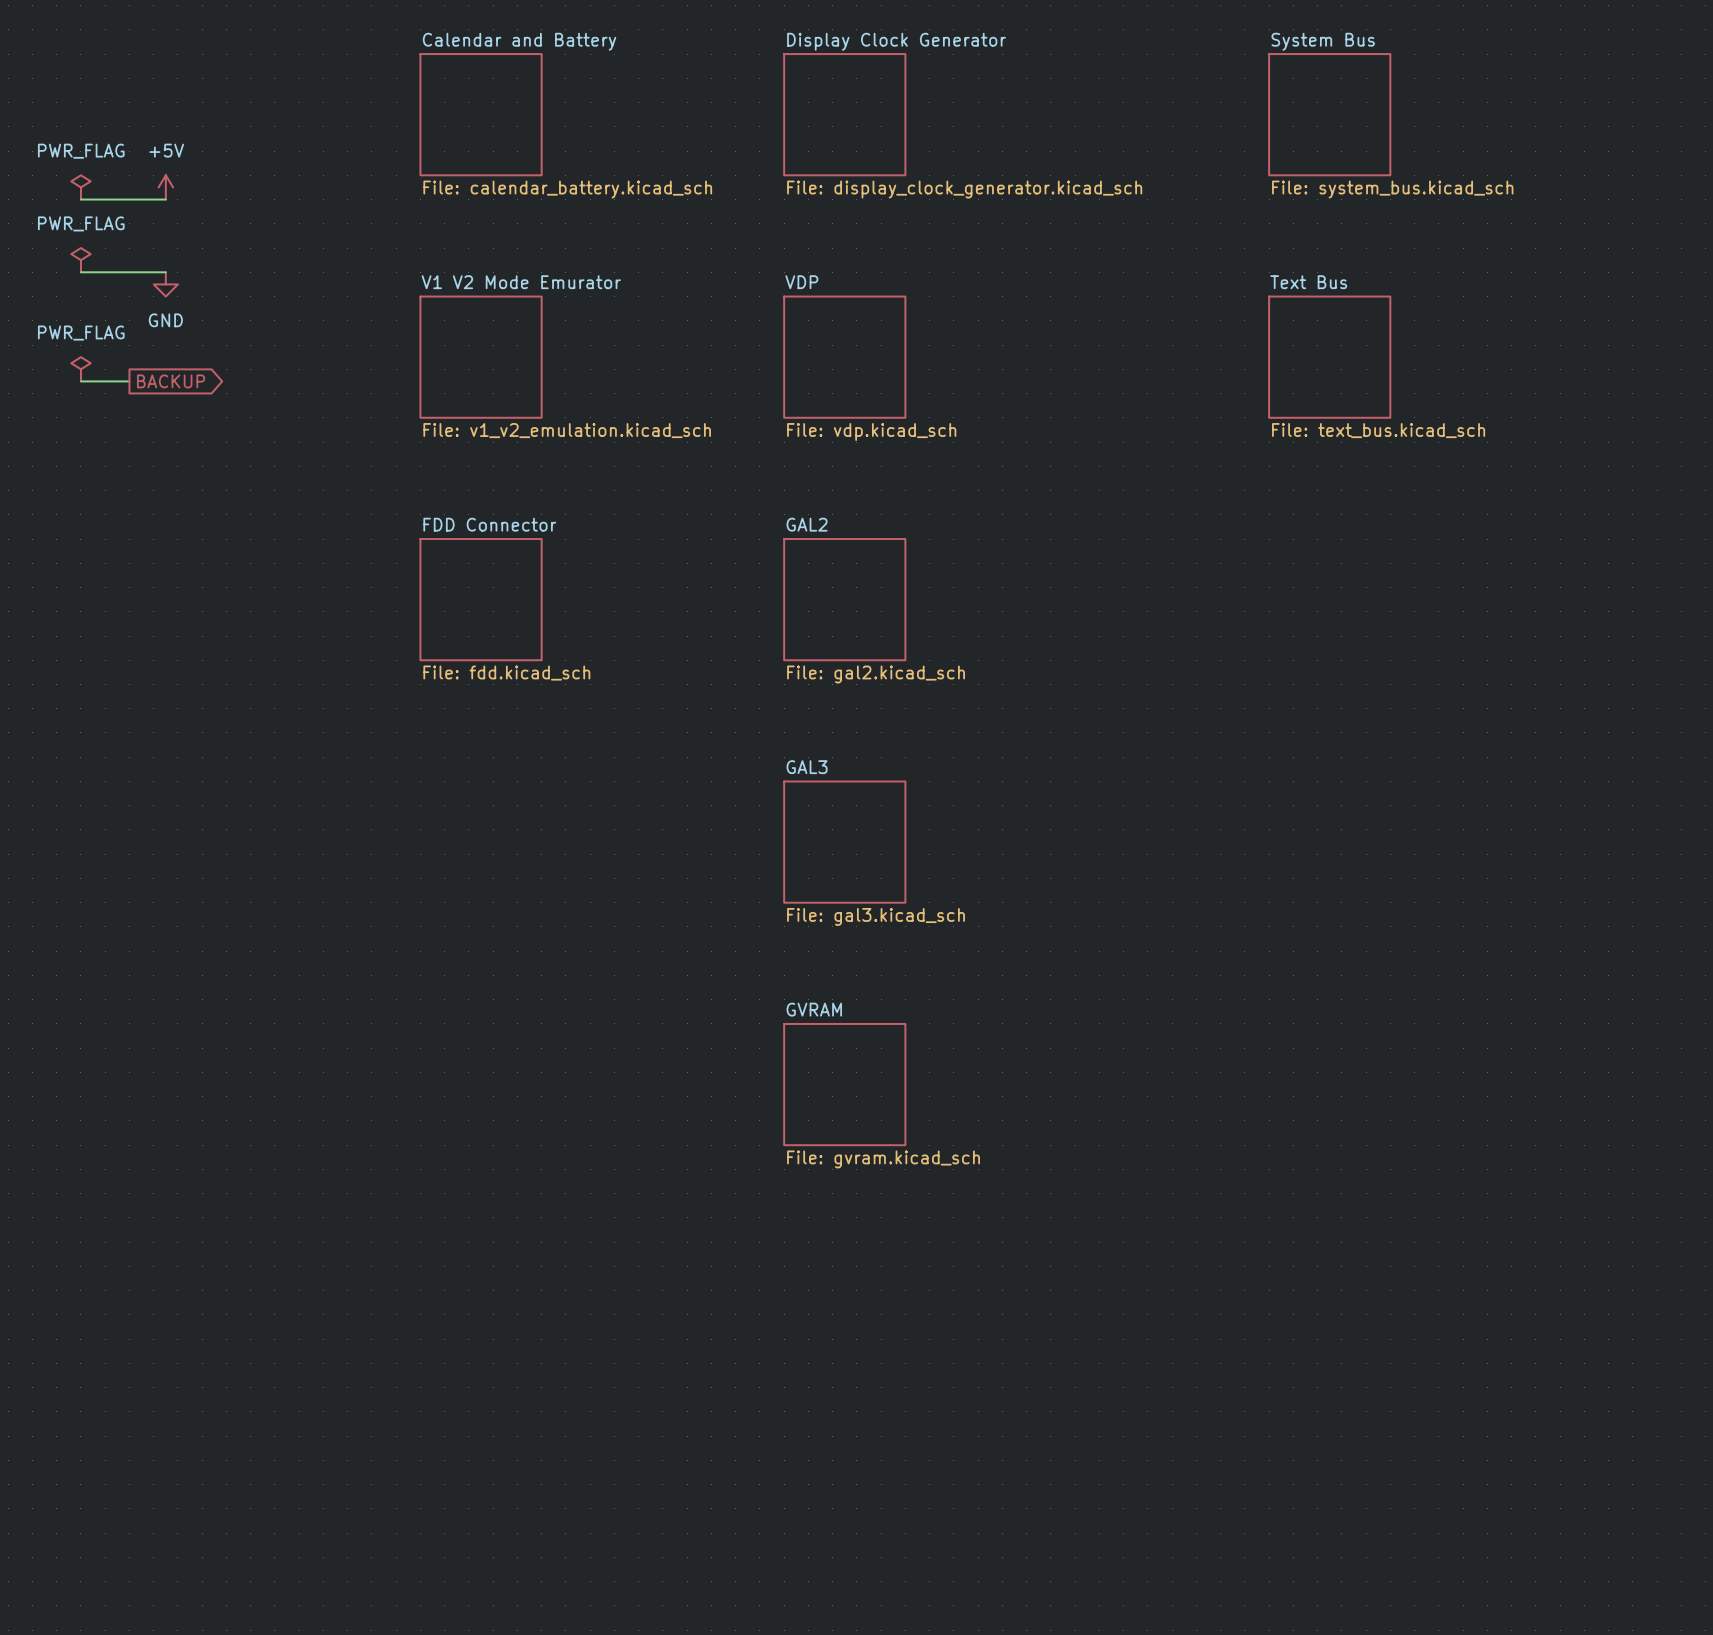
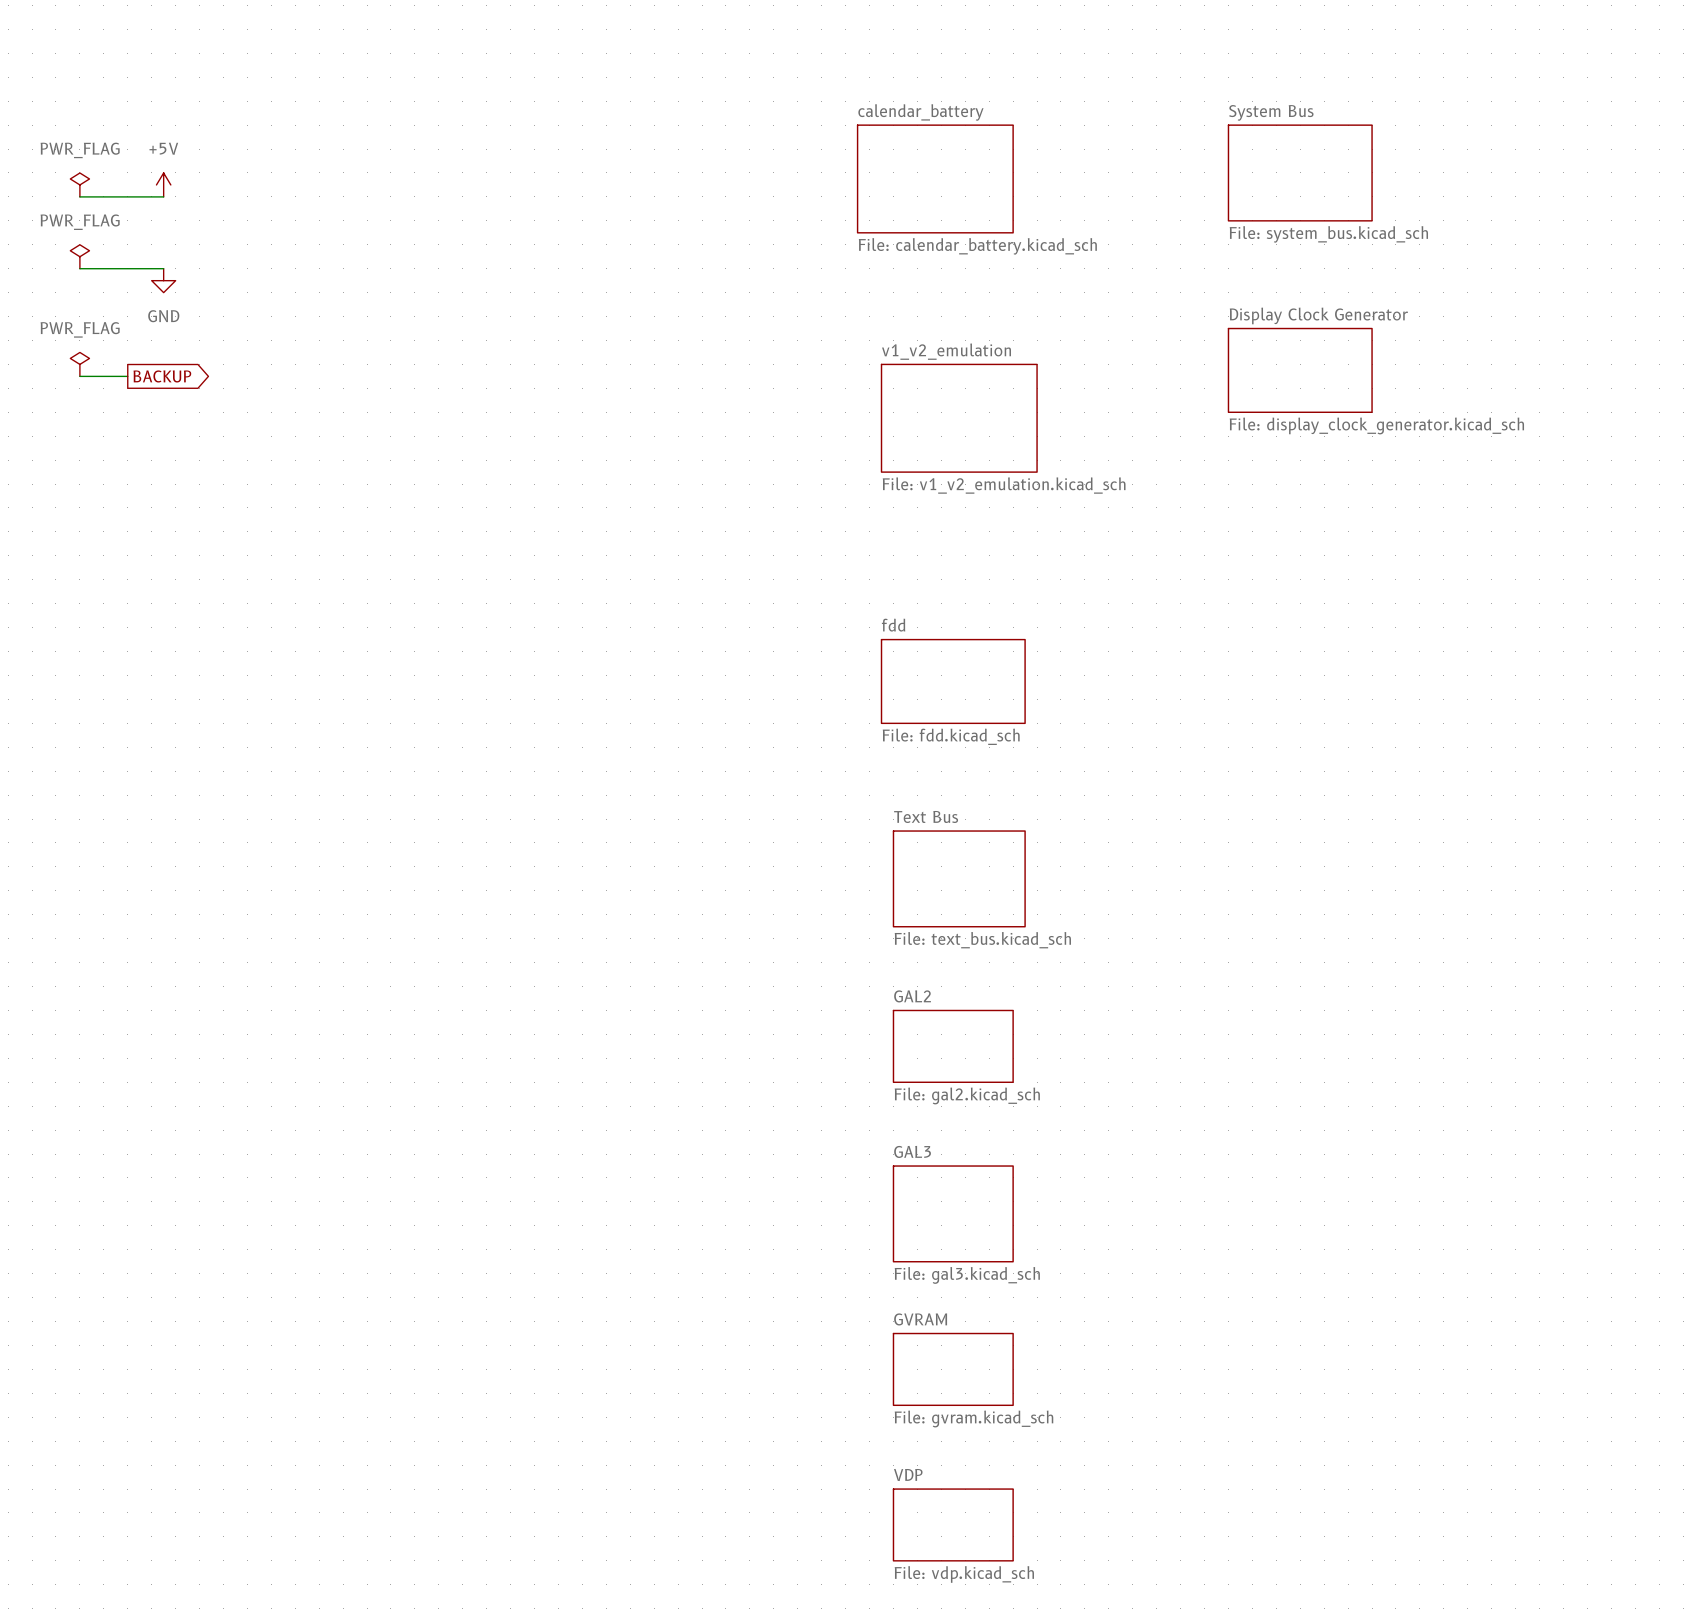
sheet Calendar and Battery: File: calendar_battery.kicad_sch (481, 114) -> none
sheet Display Clock Generator: File: display_clock_generator.kicad_sch (844, 114) -> none
sheet System Bus: File: system_bus.kicad_sch (1329, 114) -> none
sheet System Bus: none -> File: system_bus.kicad_sch (1300, 172)
sheet calendar_battery: none -> File: calendar_battery.kicad_sch (935, 178)
sheet V1 V2 Mode Emurator: File: v1_v2_emulation.kicad_sch (481, 357) -> none
sheet VDP: File: vdp.kicad_sch (844, 357) -> none
sheet Text Bus: File: text_bus.kicad_sch (1329, 357) -> none
sheet Display Clock Generator: none -> File: display_clock_generator.kicad_sch (1300, 370)
sheet v1_v2_emulation: none -> File: v1_v2_emulation.kicad_sch (959, 418)
sheet GAL2 name position: GAL2 (807, 524) -> GAL2 (912, 996)
sheet GAL2 shape: [783, 538, 907, 661] -> [892, 1009, 1014, 1083]
sheet FDD Connector: File: fdd.kicad_sch (481, 599) -> none
sheet GAL2 value position: File: gal2.kicad_sch (876, 674) -> File: gal2.kicad_sch (967, 1095)
sheet fdd: none -> File: fdd.kicad_sch (953, 681)
sheet GAL3 shape: [783, 780, 907, 904] -> [892, 1165, 1014, 1263]
sheet Text Bus: none -> File: text_bus.kicad_sch (959, 878)
sheet GVRAM: File: gvram.kicad_sch (844, 1084) -> none
sheet GVRAM: none -> File: gvram.kicad_sch (953, 1369)
sheet VDP: none -> File: vdp.kicad_sch (953, 1524)

